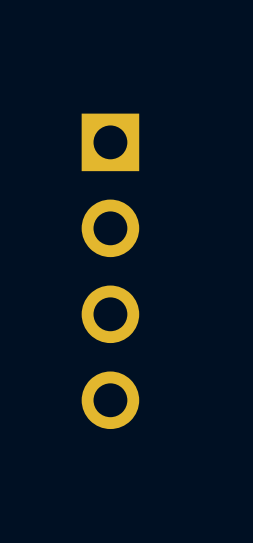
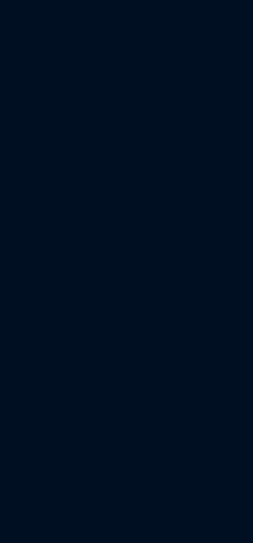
part: (110, 271) -> none

